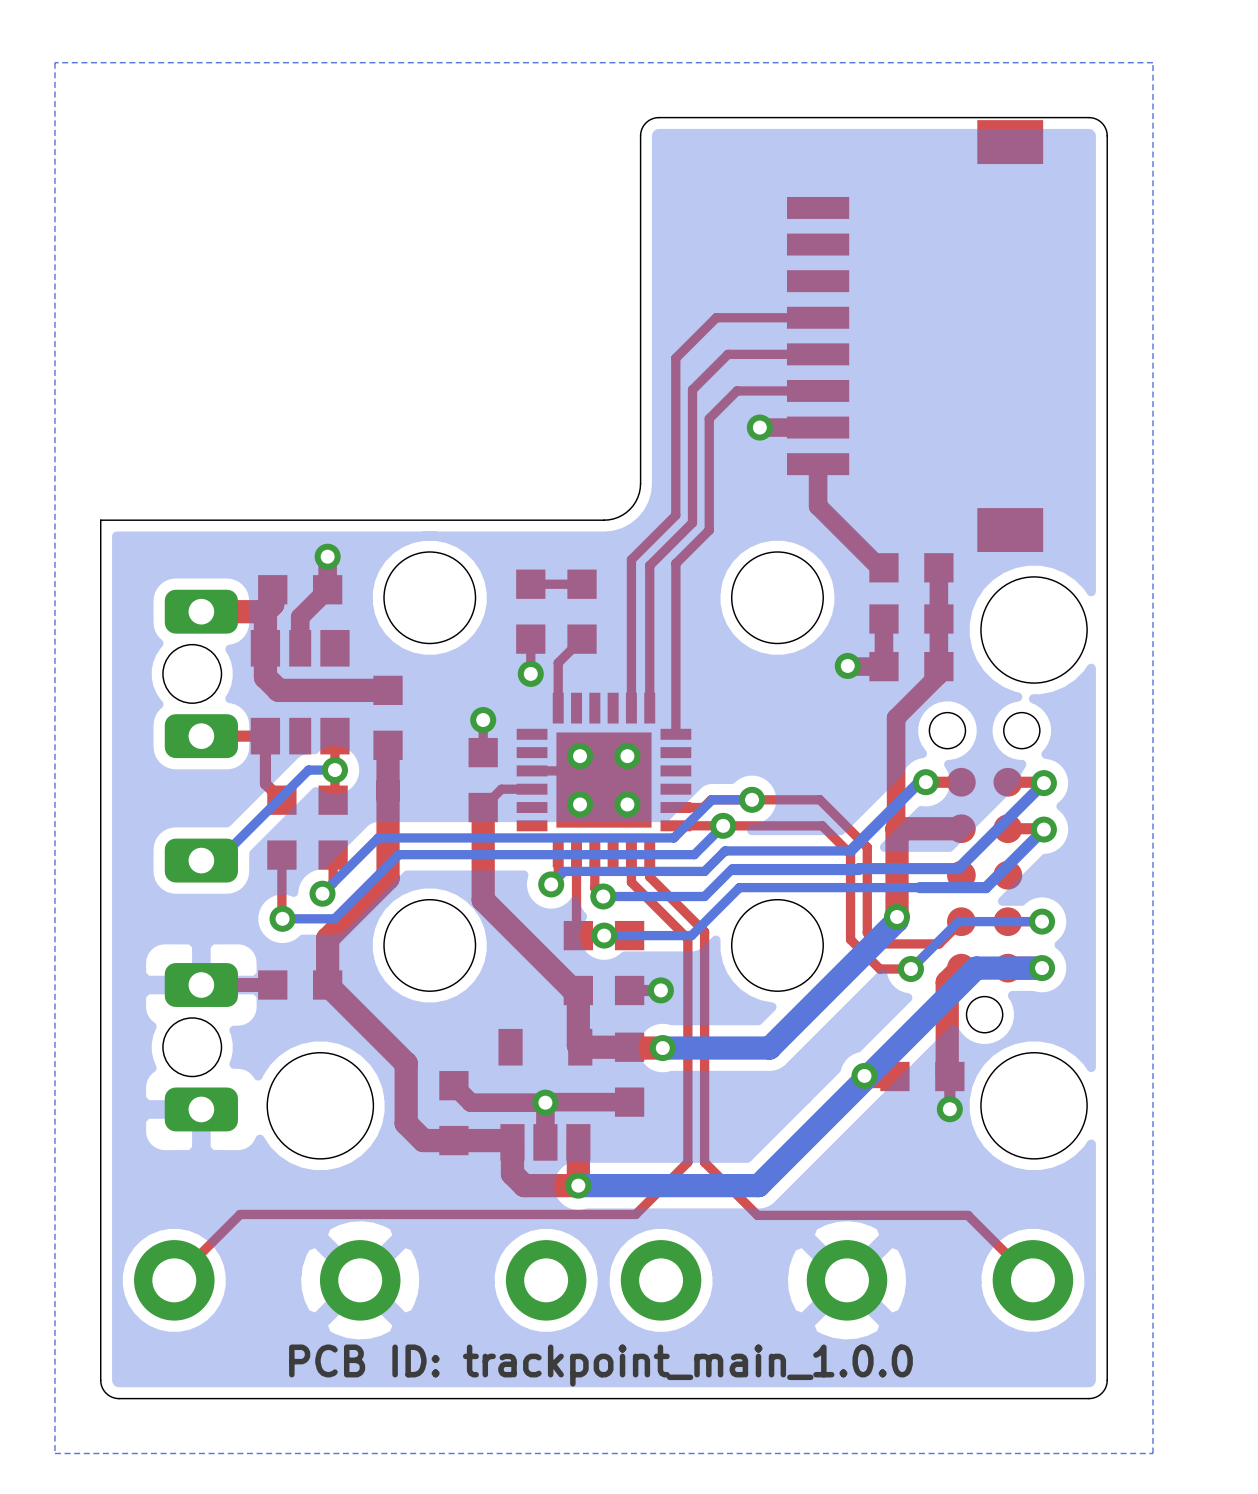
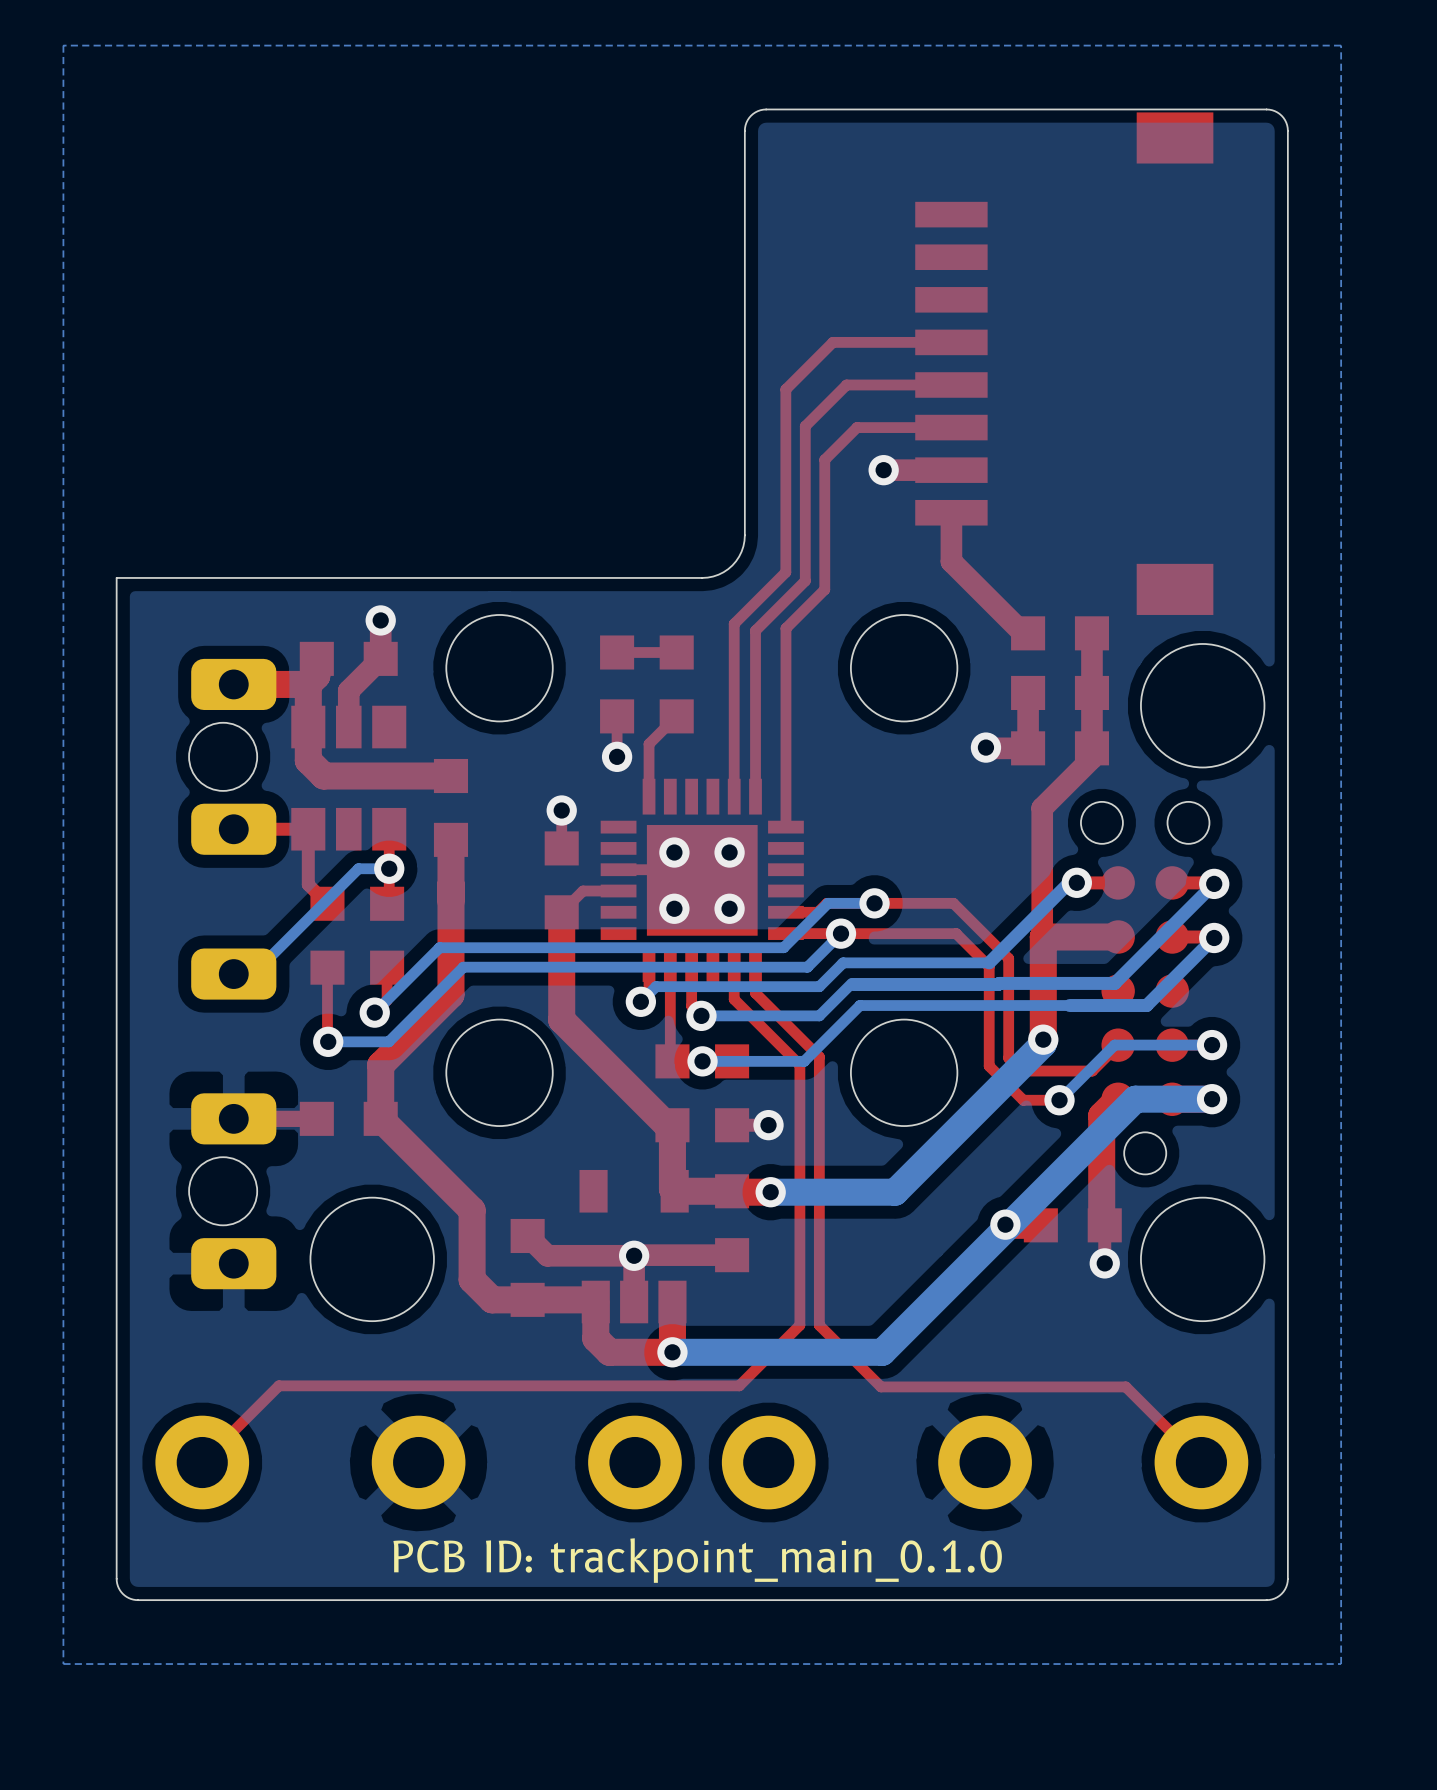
text: PCB ID: trackpoint_main_1.0.0 (600, 1365) -> PCB ID: trackpoint_main_0.1.0 (697, 1560)

